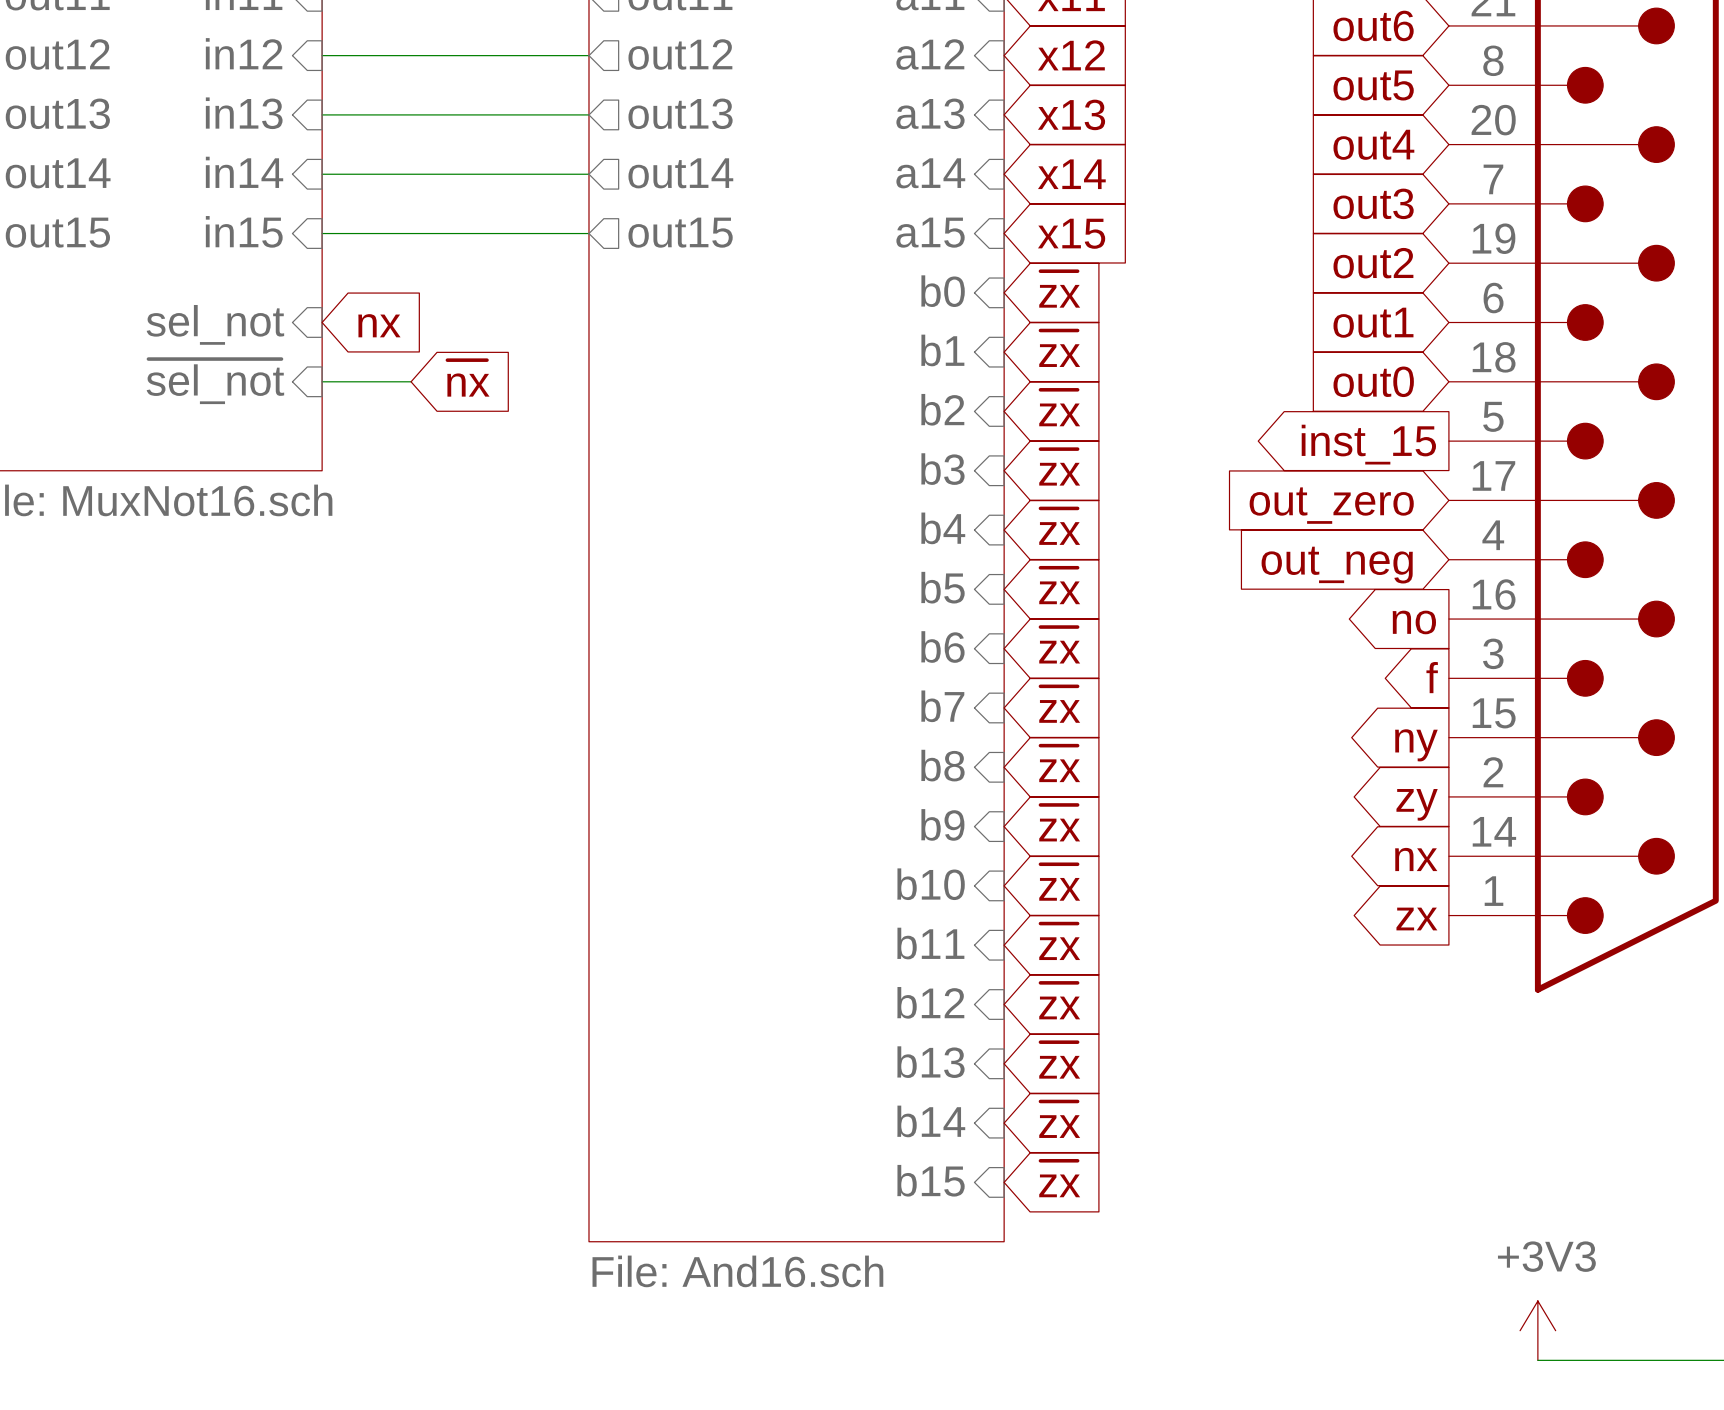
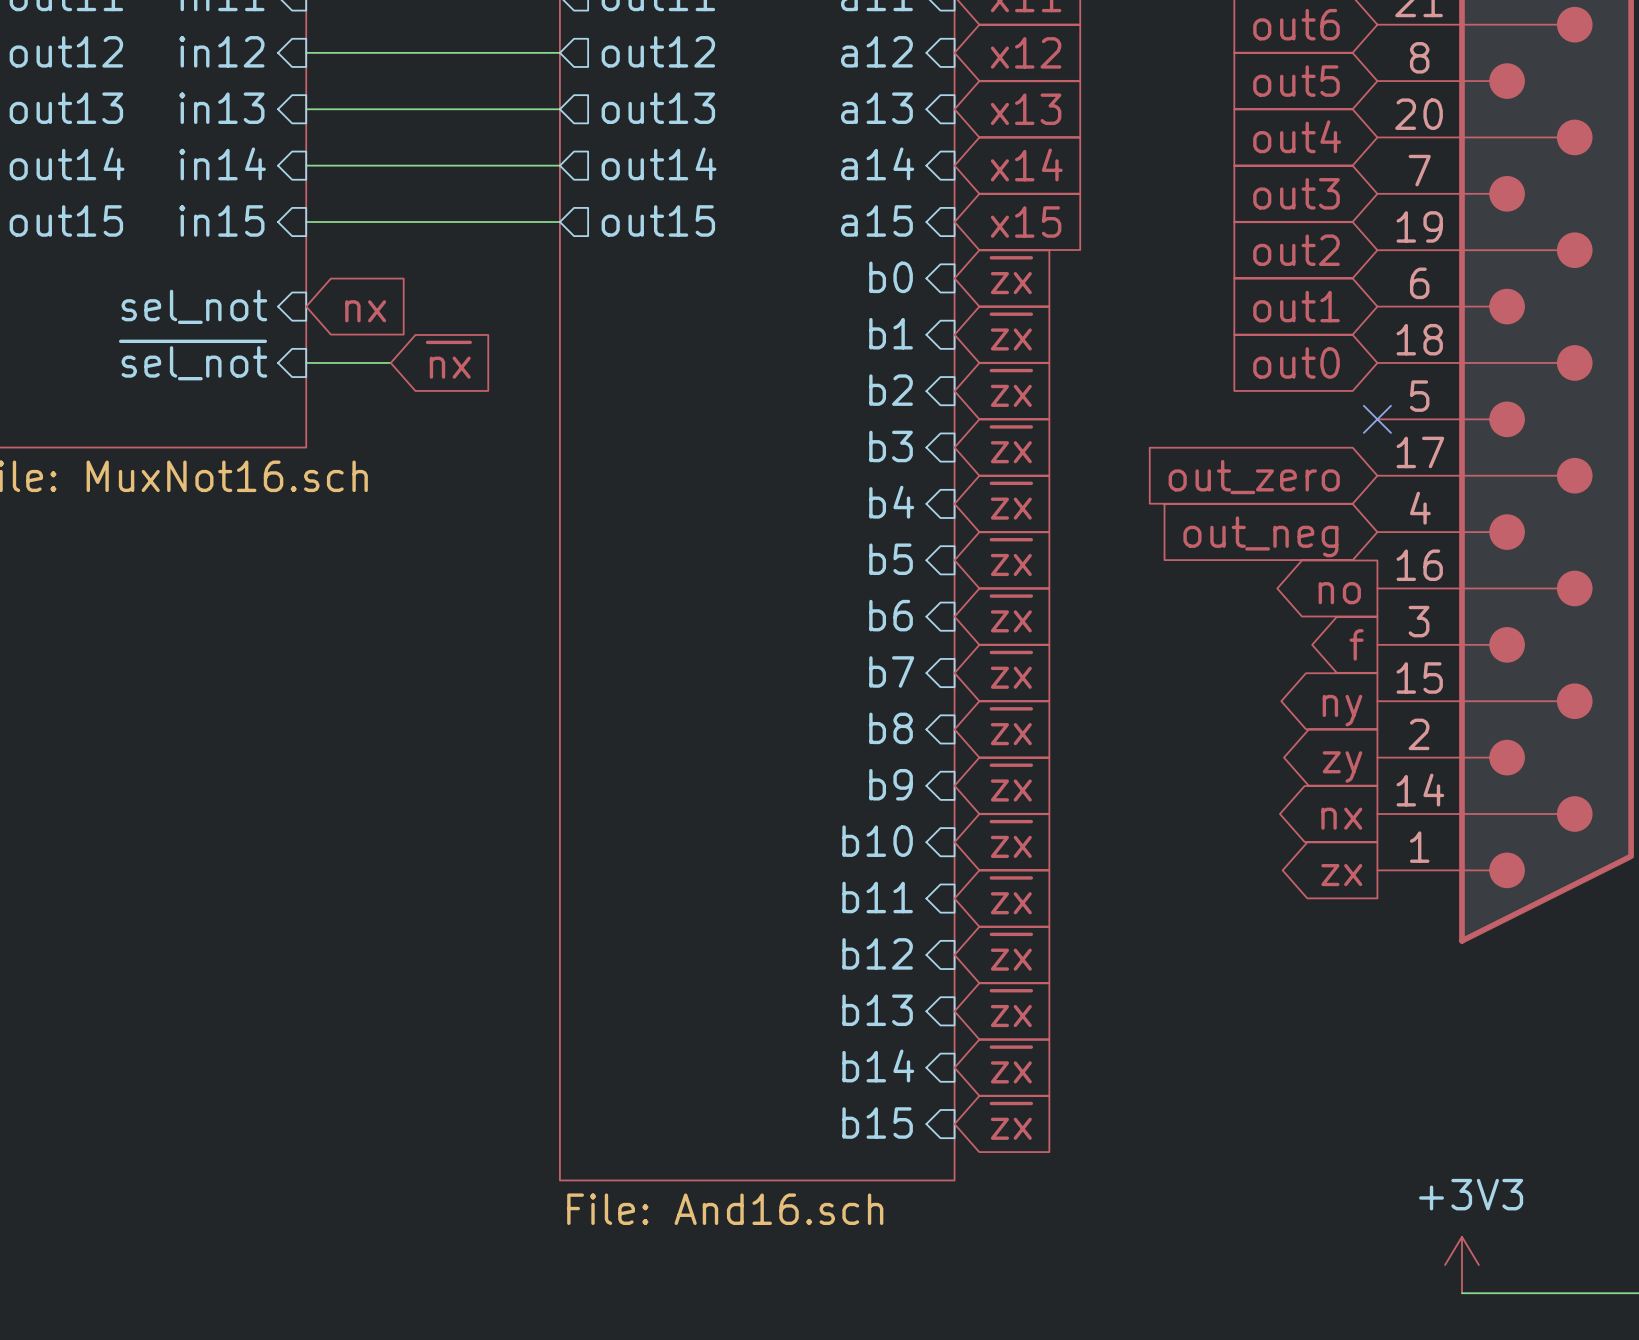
no-connect mark: none -> (1377, 419)
global label: inst_15 (1368, 444) -> none

